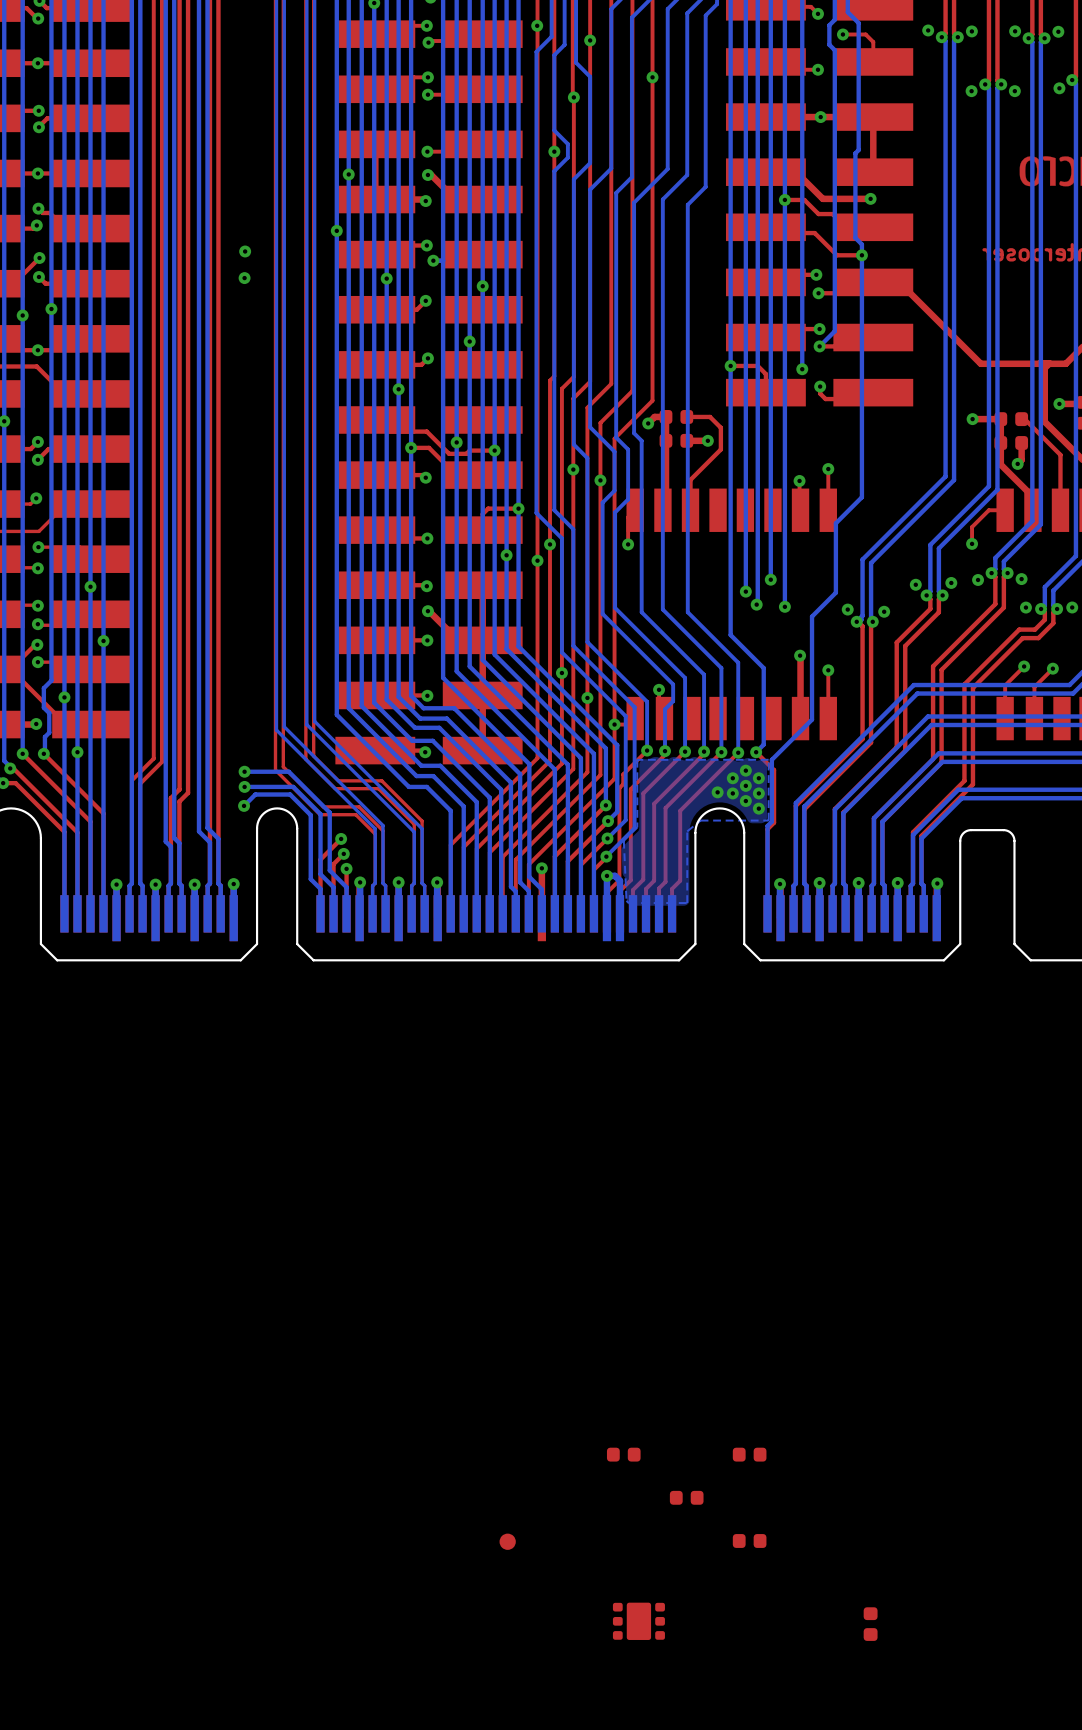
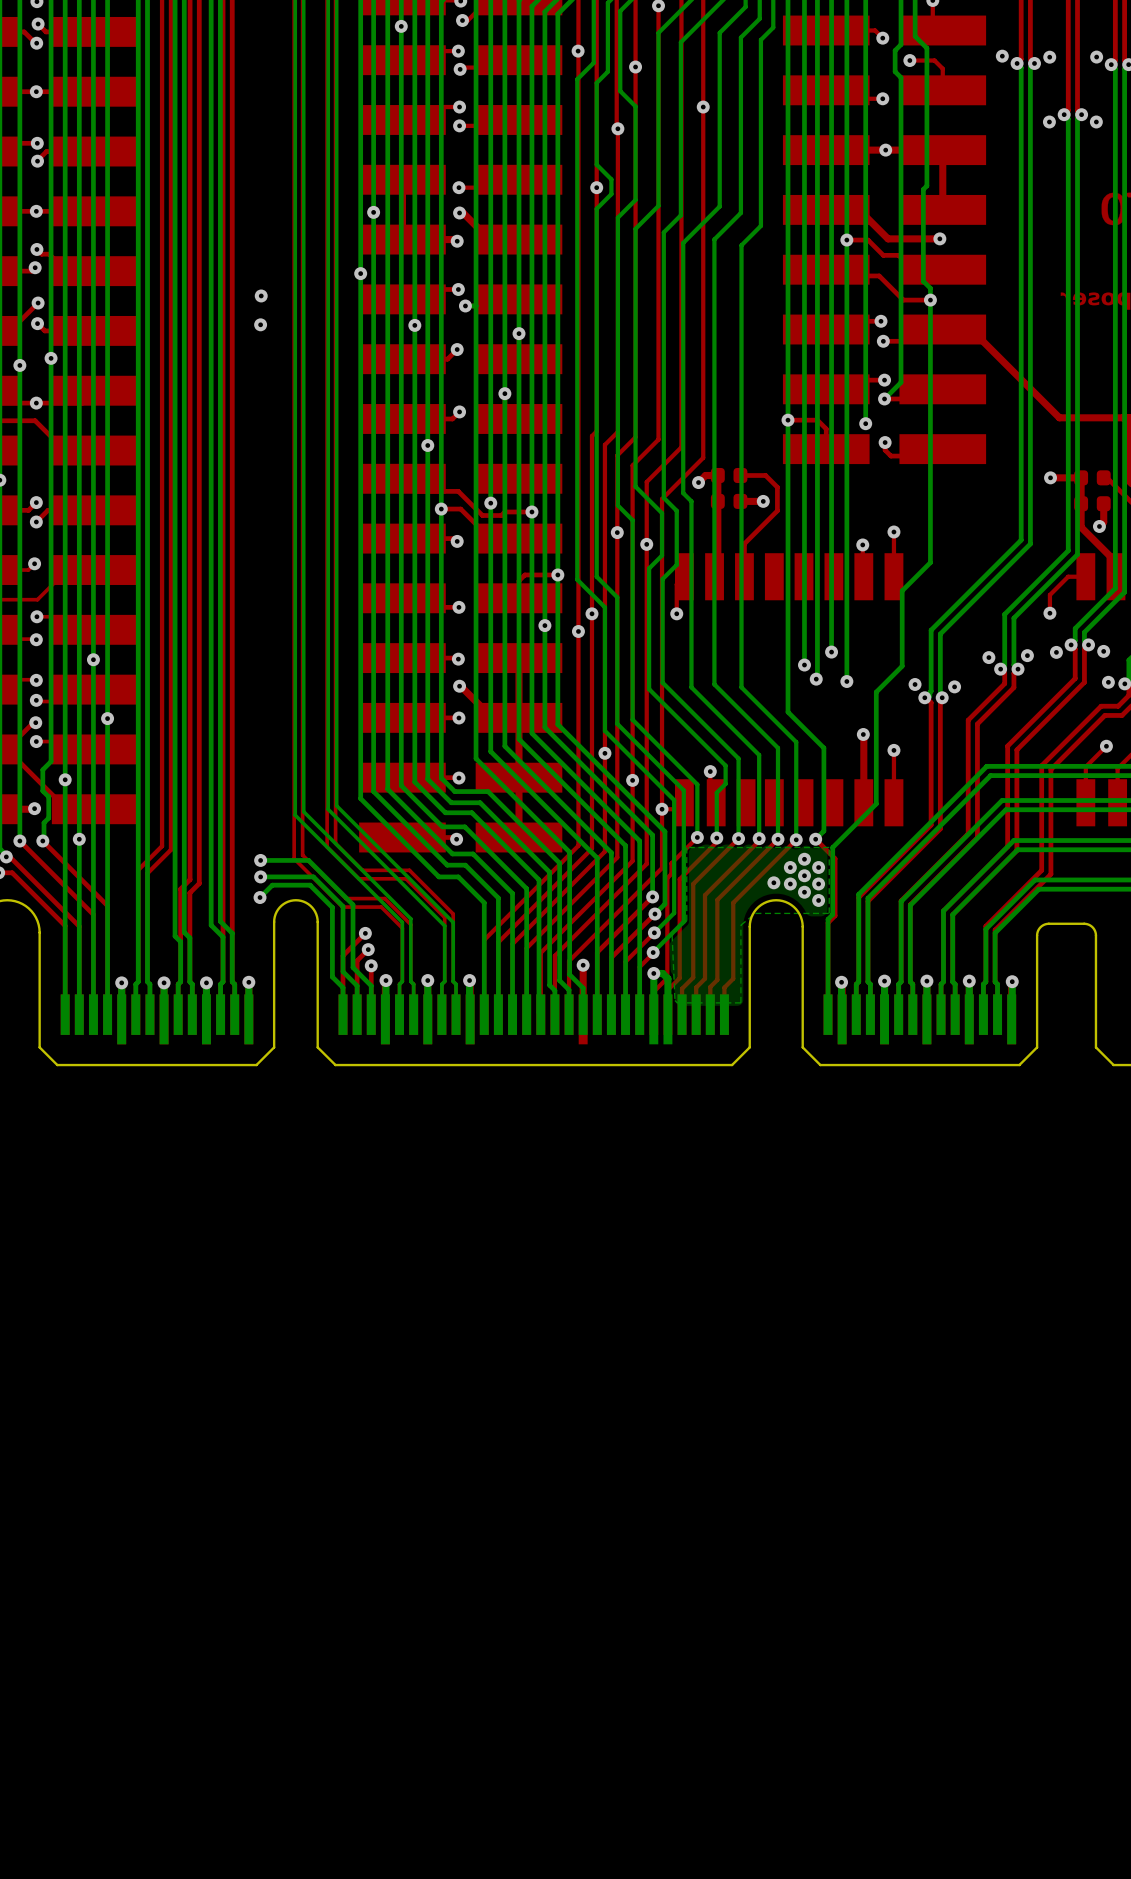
part: (623, 1454) -> none
part: (749, 1454) -> none
part: (686, 1497) -> none
part: (749, 1540) -> none
part: (507, 1541) -> none
part: (638, 1621) -> none
part: (870, 1624) -> none

